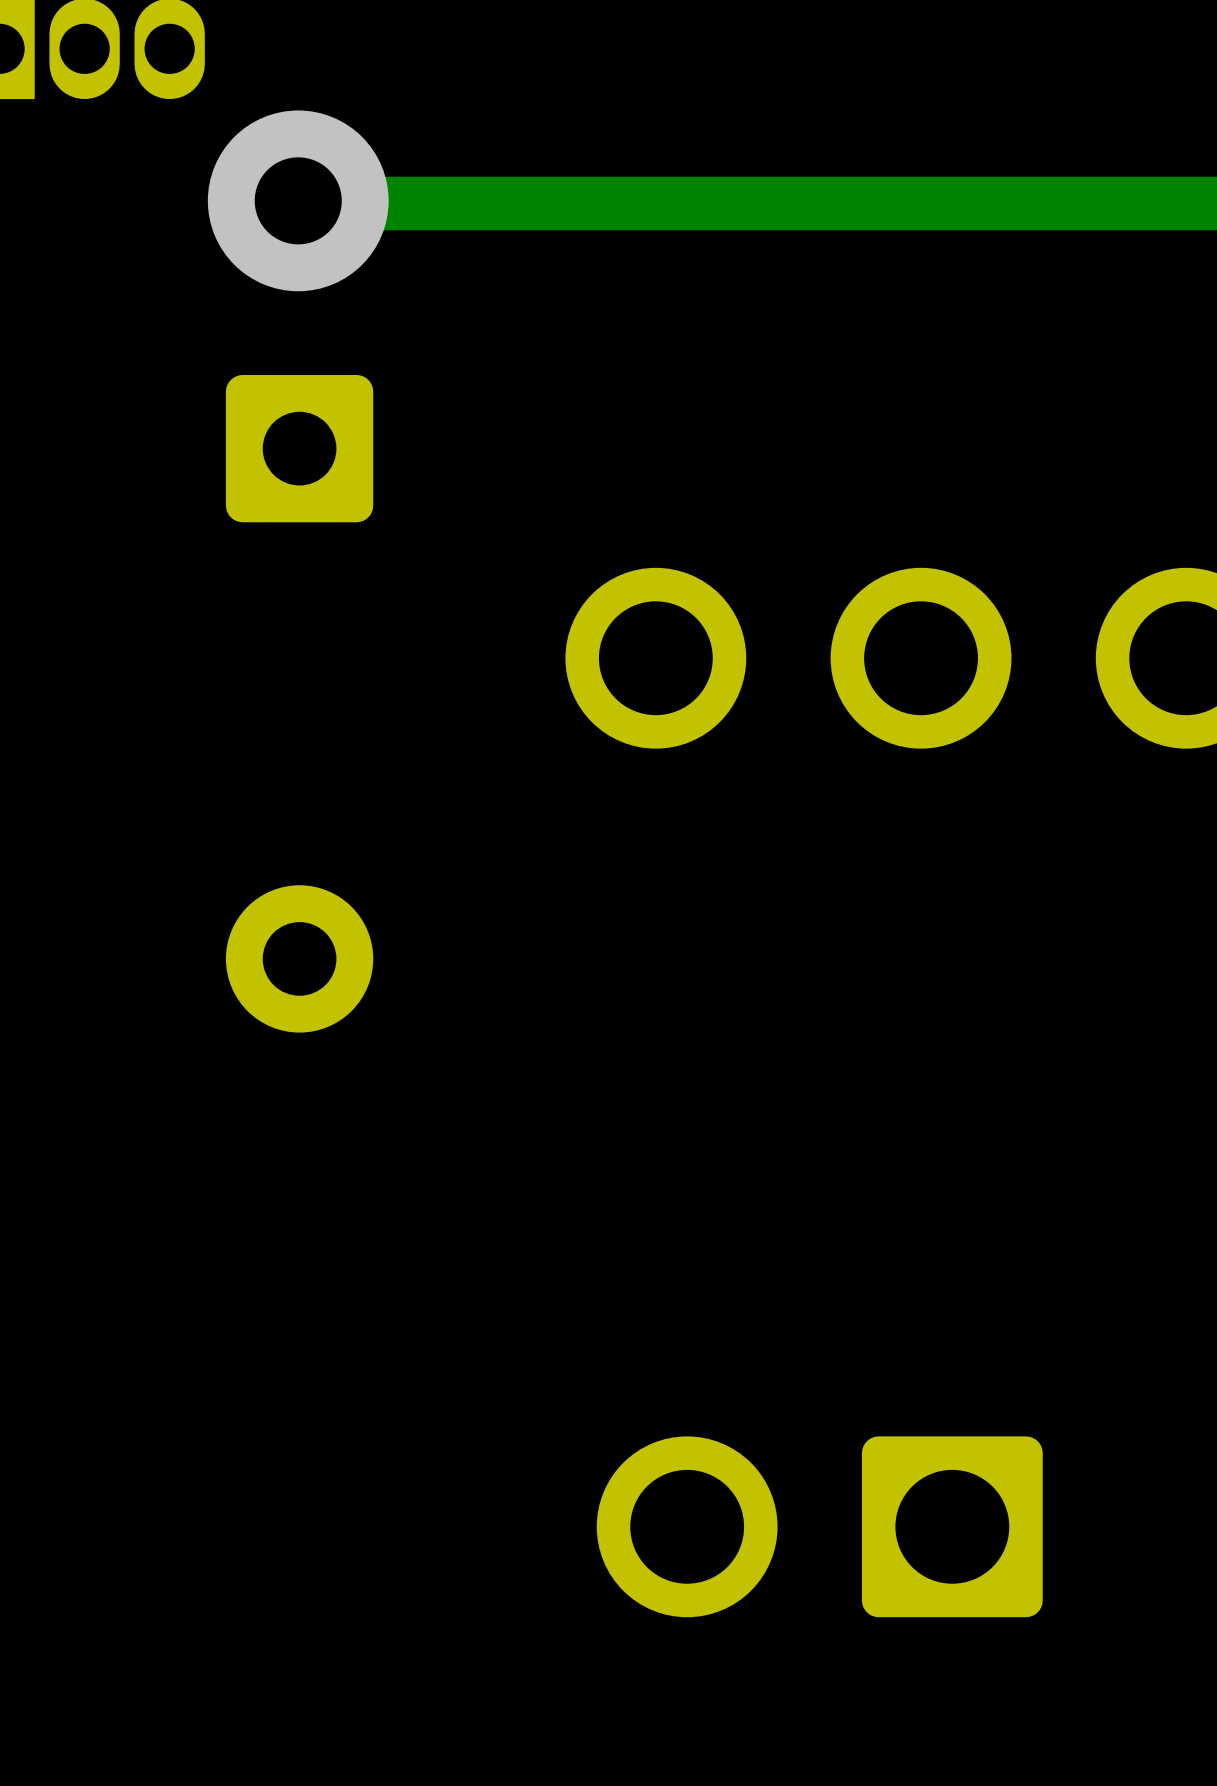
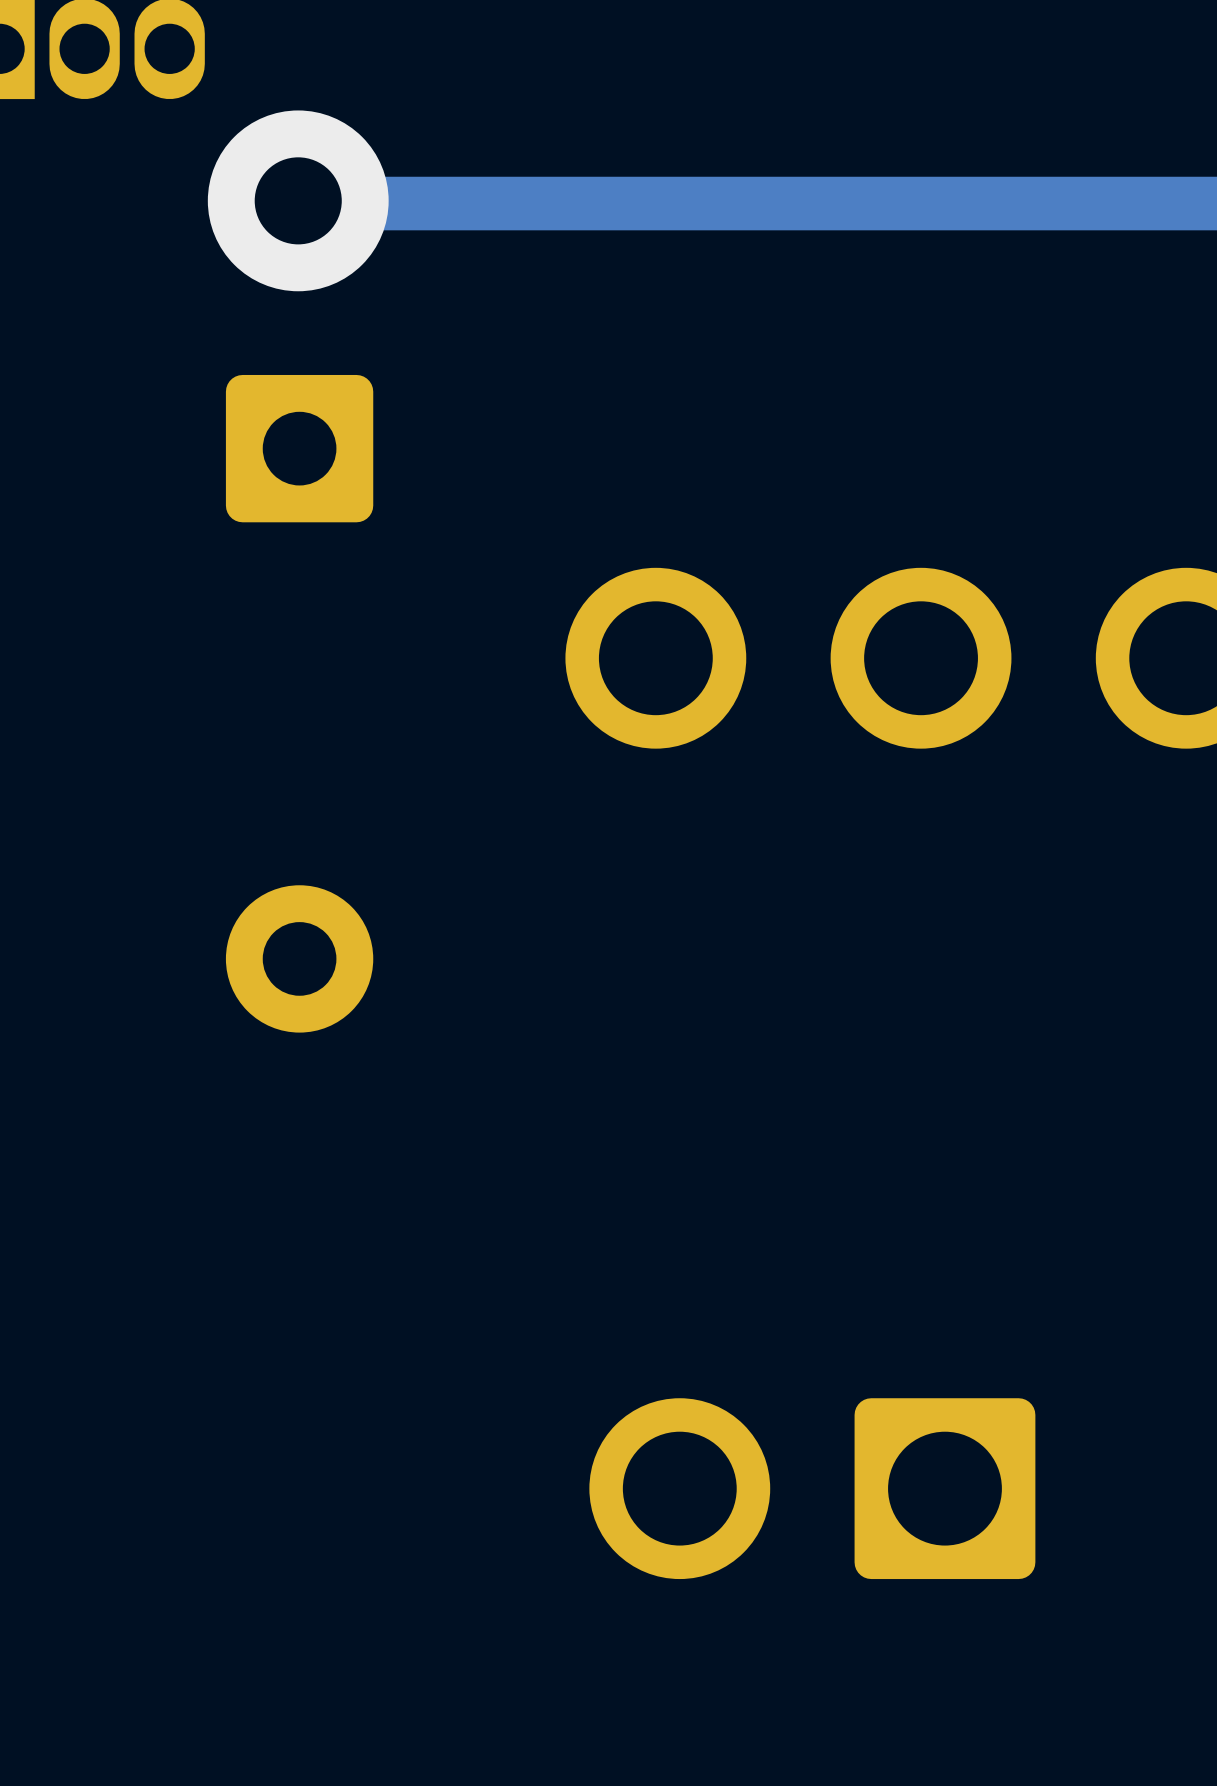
part position: (819, 1526) -> (812, 1488)

